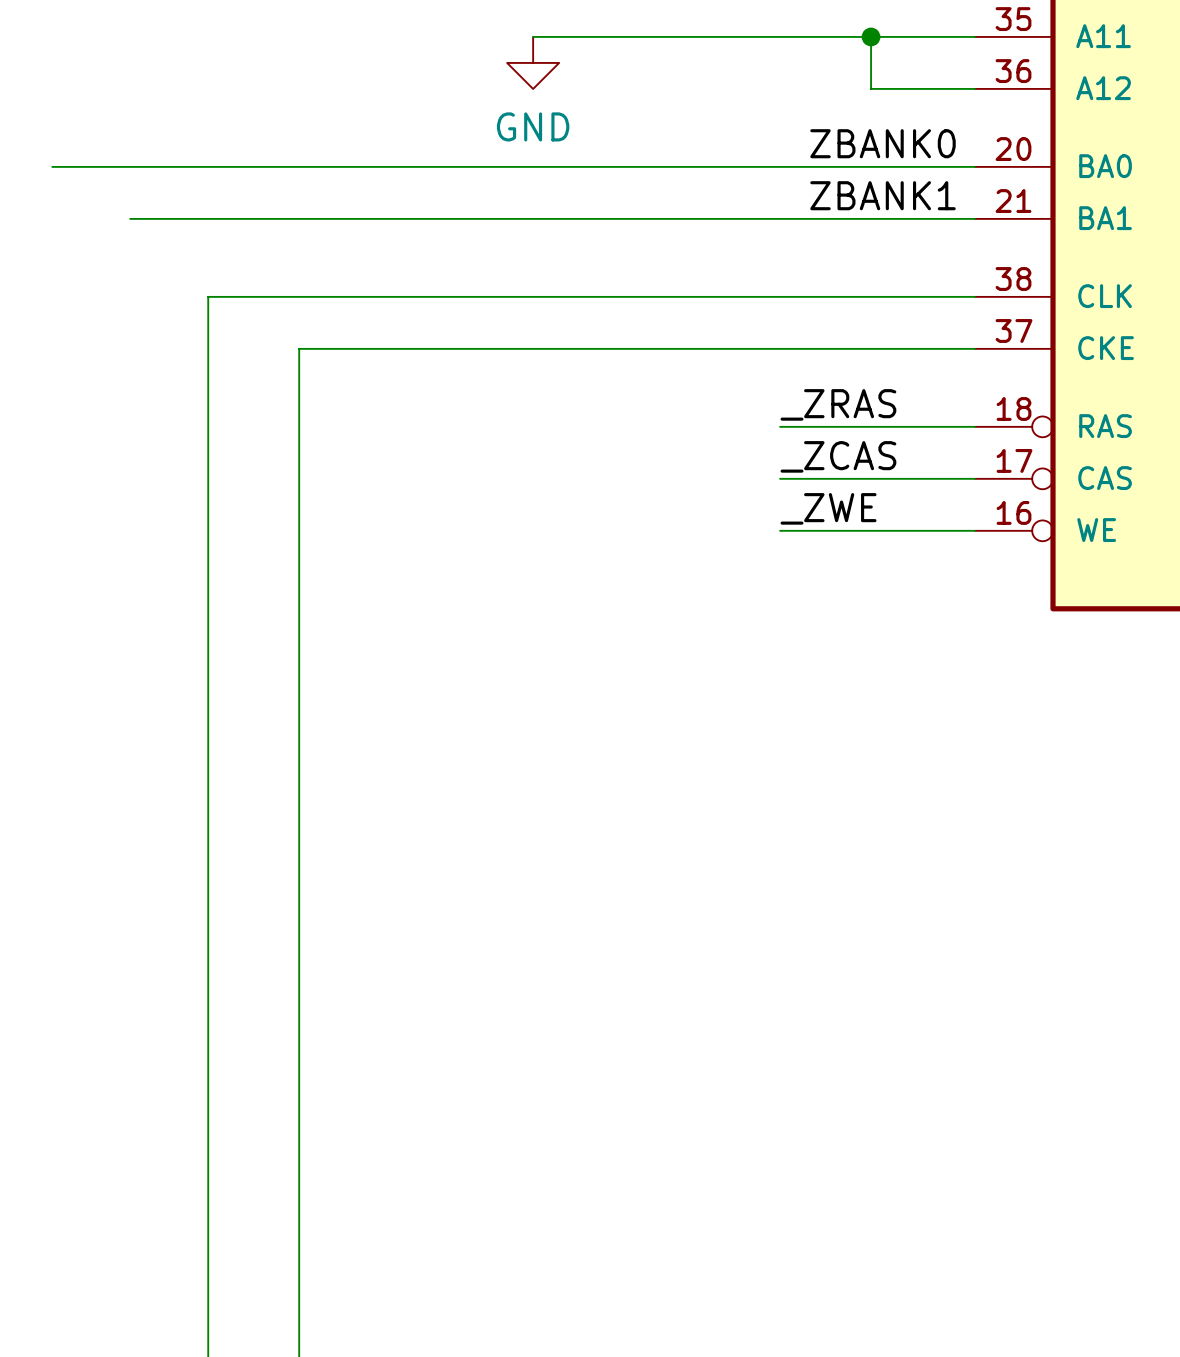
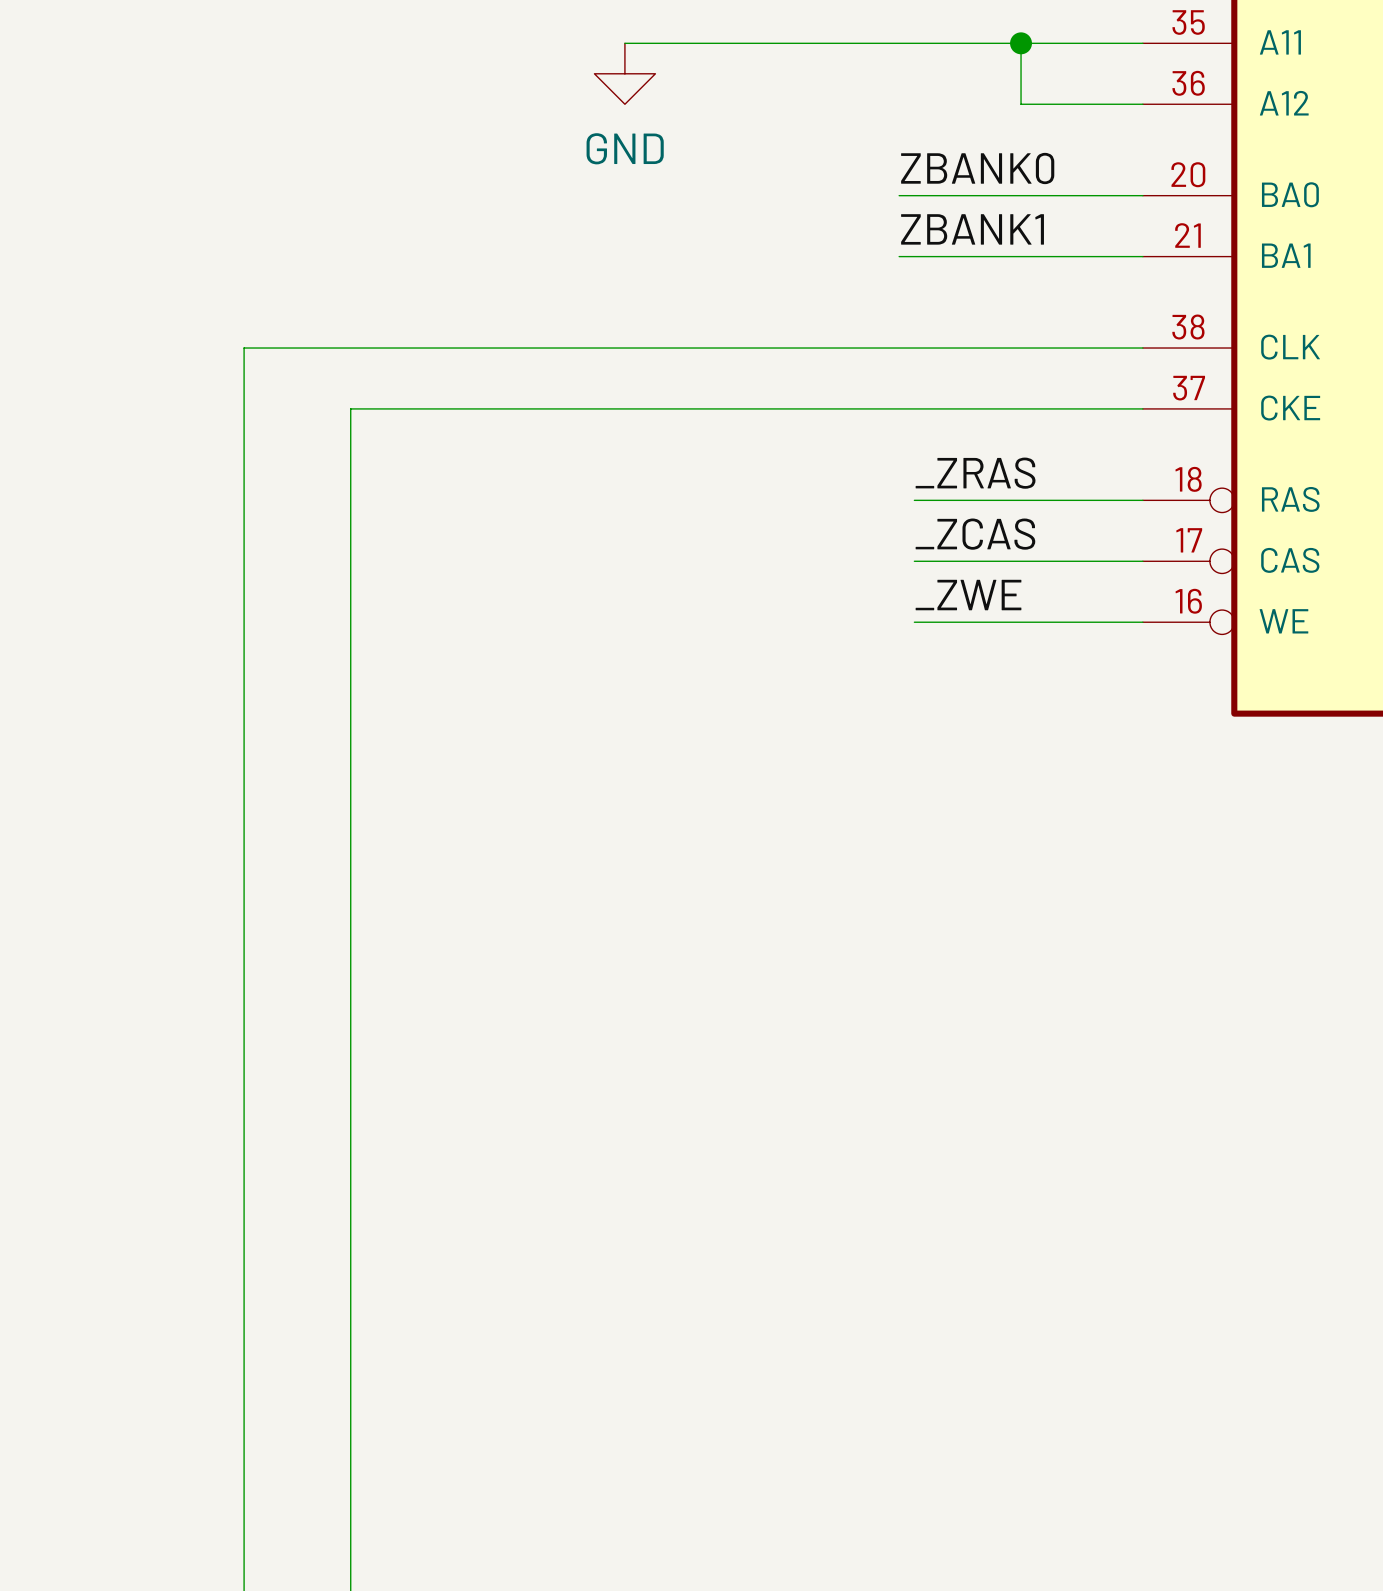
label position: ZBANK0 (883, 143) -> ZBANK0 (977, 168)
wire: (52, 166) (767, 166) -> none
label position: ZBANK1 (883, 195) -> ZBANK1 (972, 229)
wire: (130, 218) (767, 218) -> none

